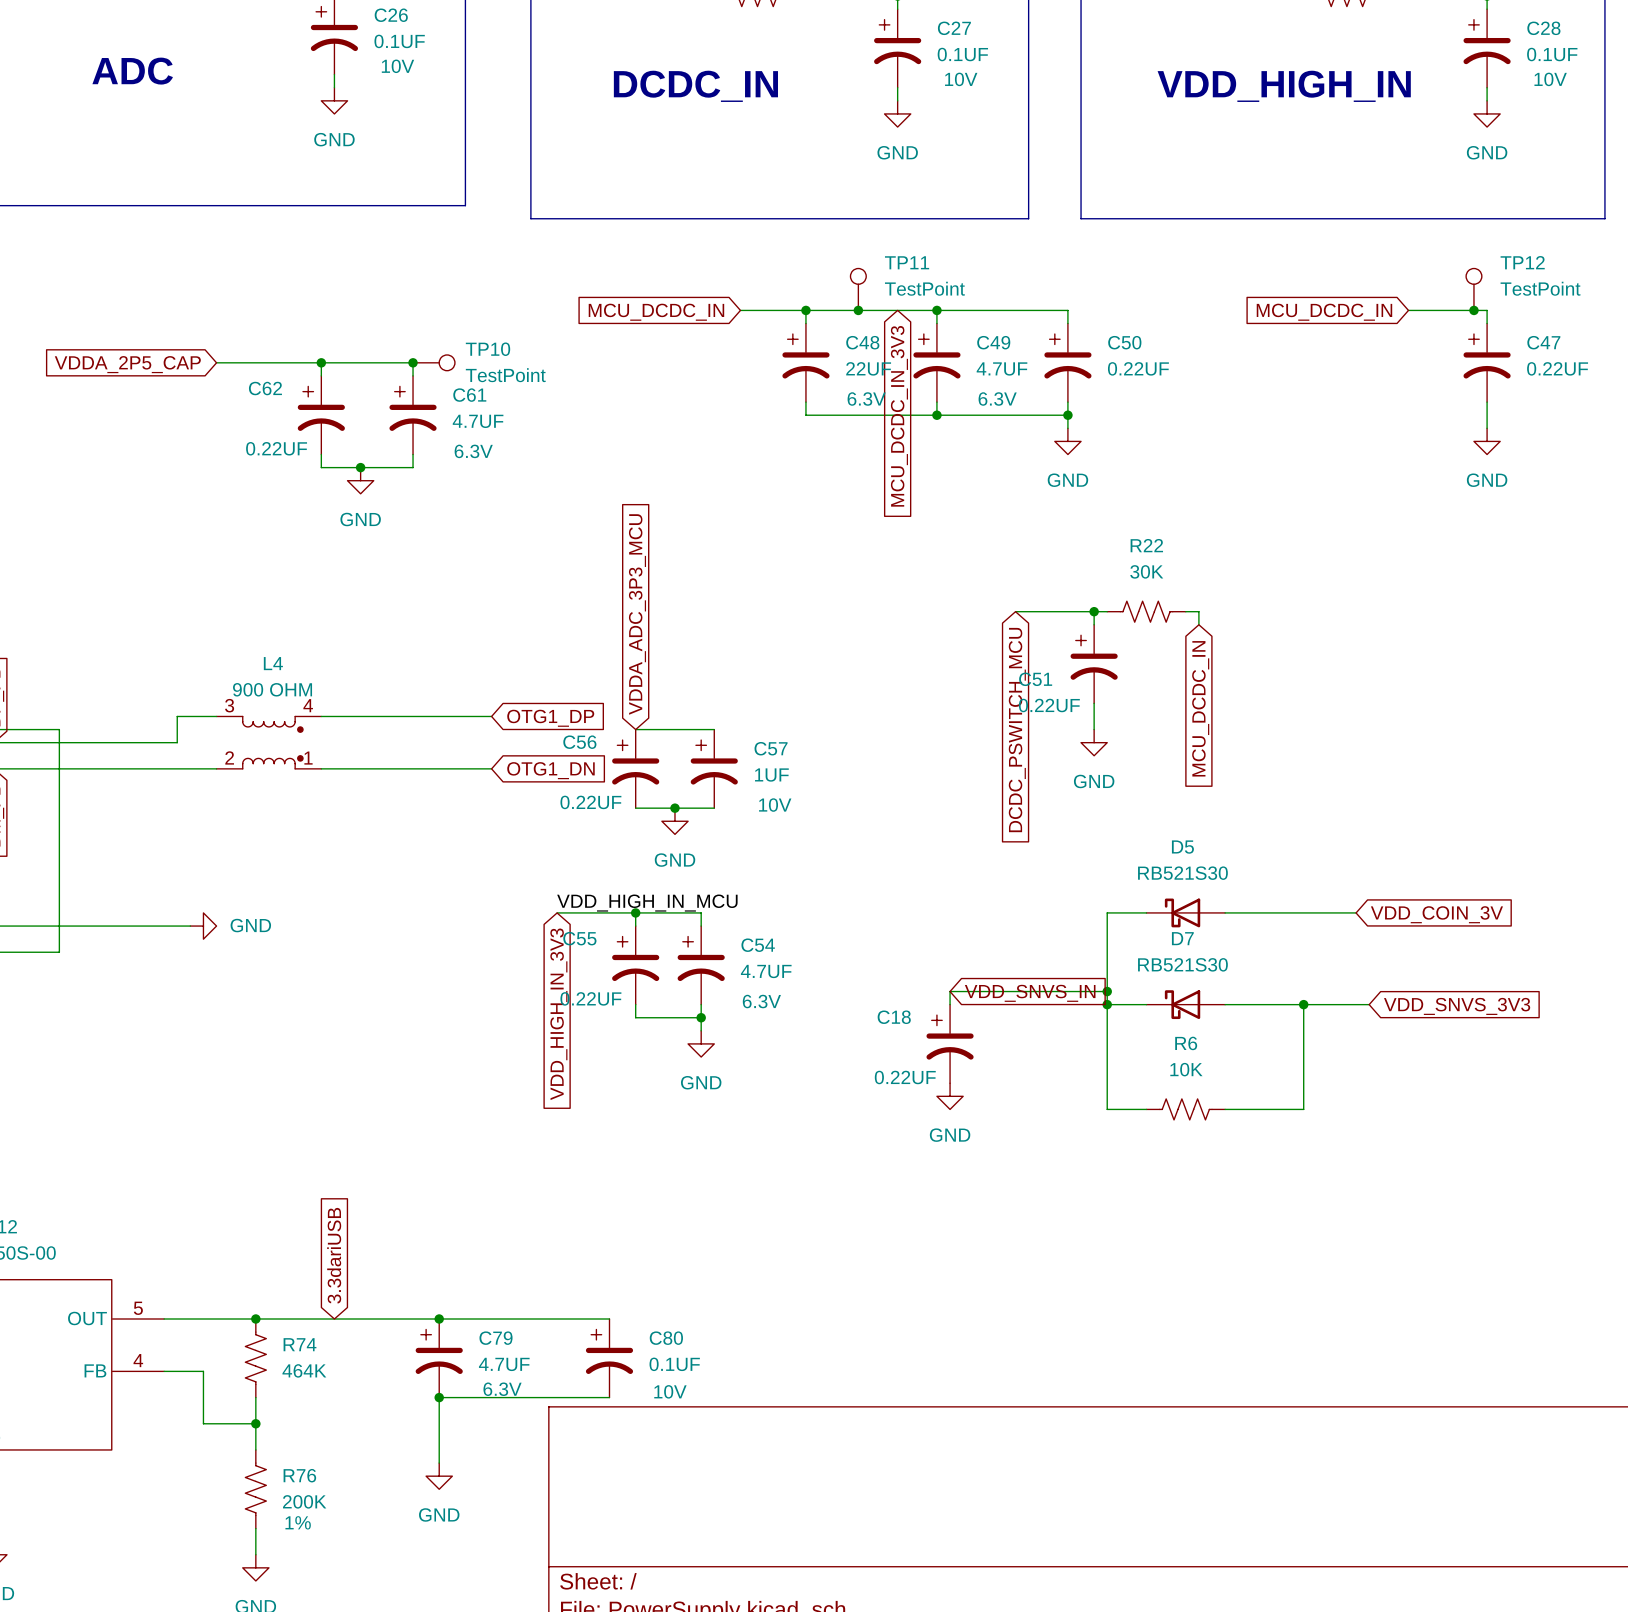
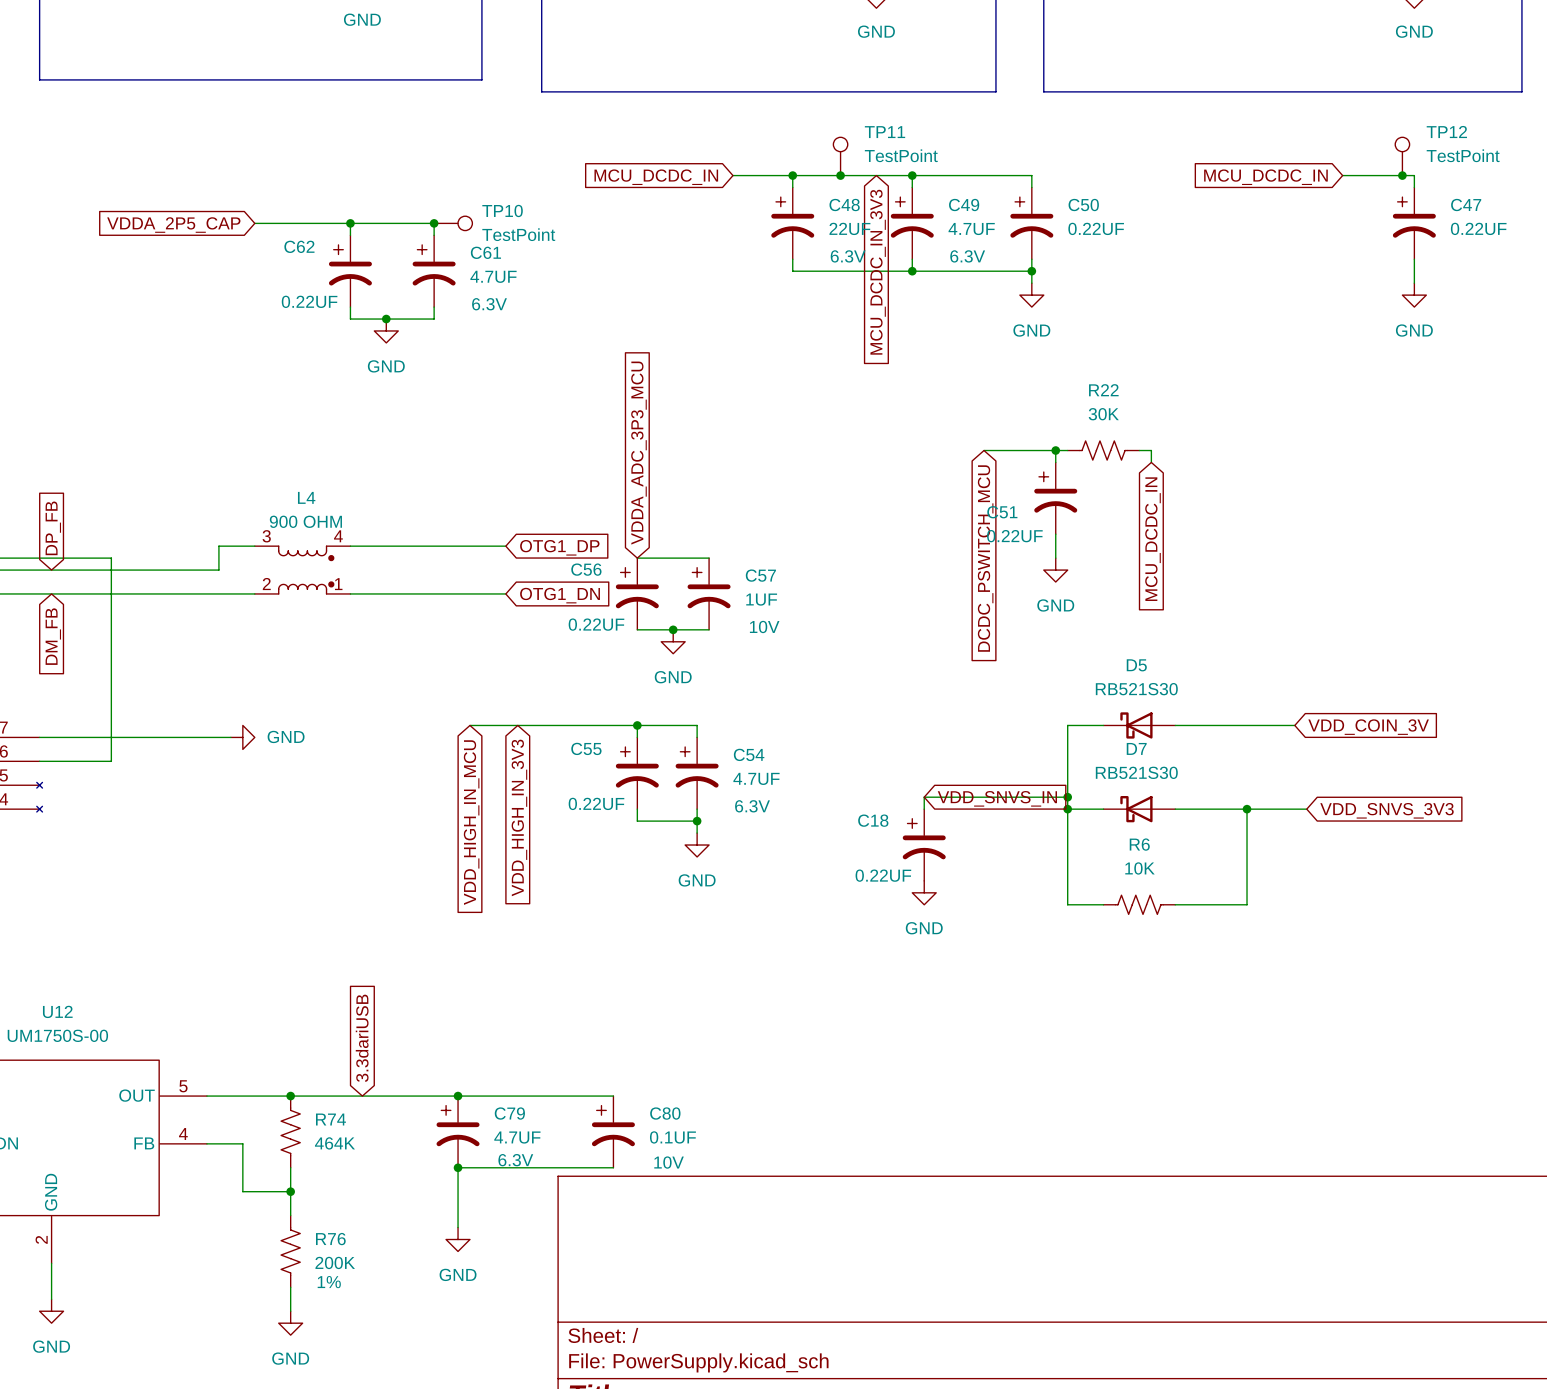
label: VDD_HIGH_IN_MCU (647, 903) -> none
wire: none -> (469, 725) (565, 725)
global label position: VDD_HIGH_IN_3V3 (558, 1014) -> VDD_HIGH_IN_3V3 (519, 817)
global label: none -> VDD_HIGH_IN_MCU (471, 822)

